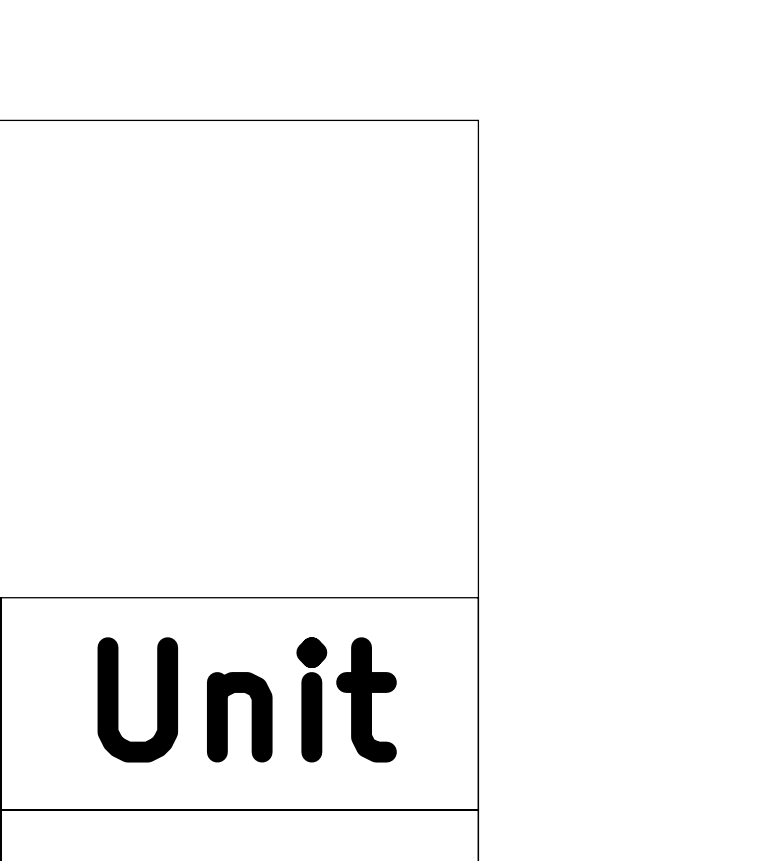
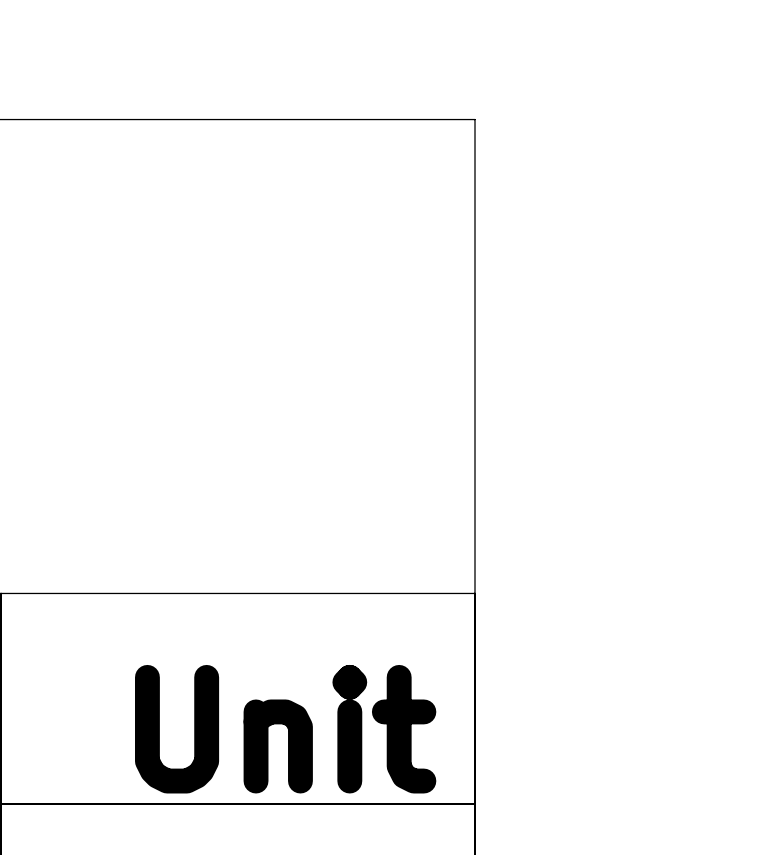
text position: Unit (247, 699) -> Unit (285, 729)

